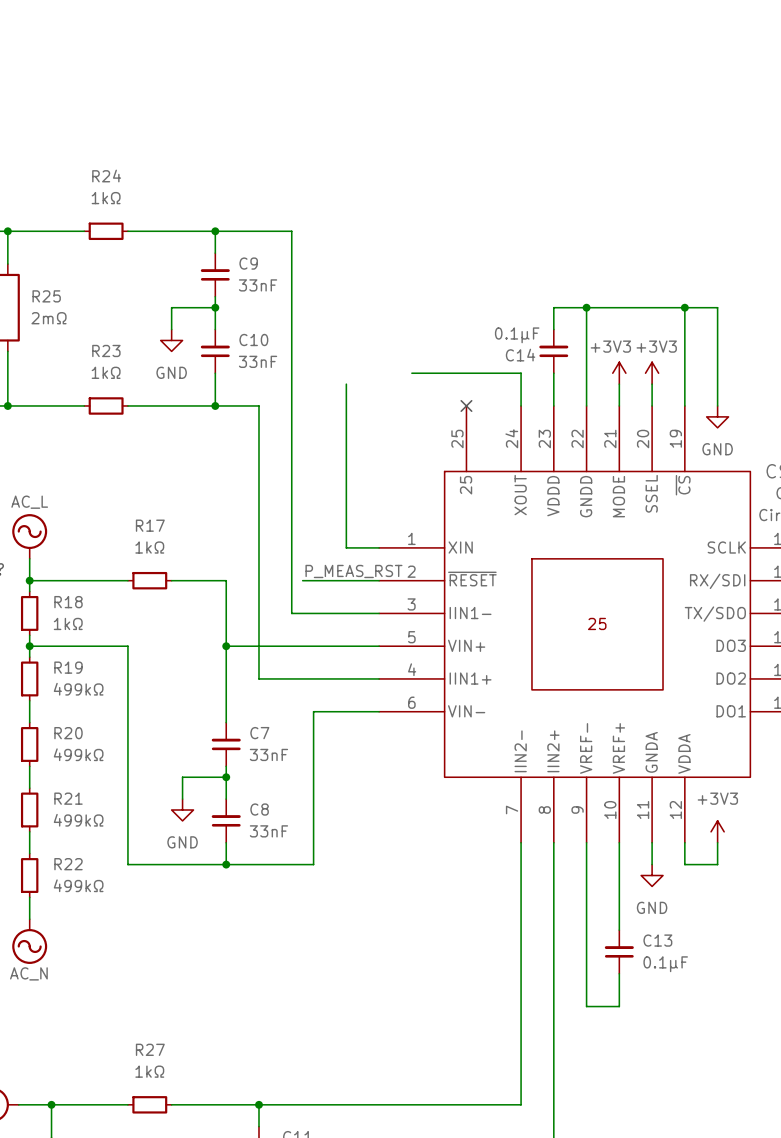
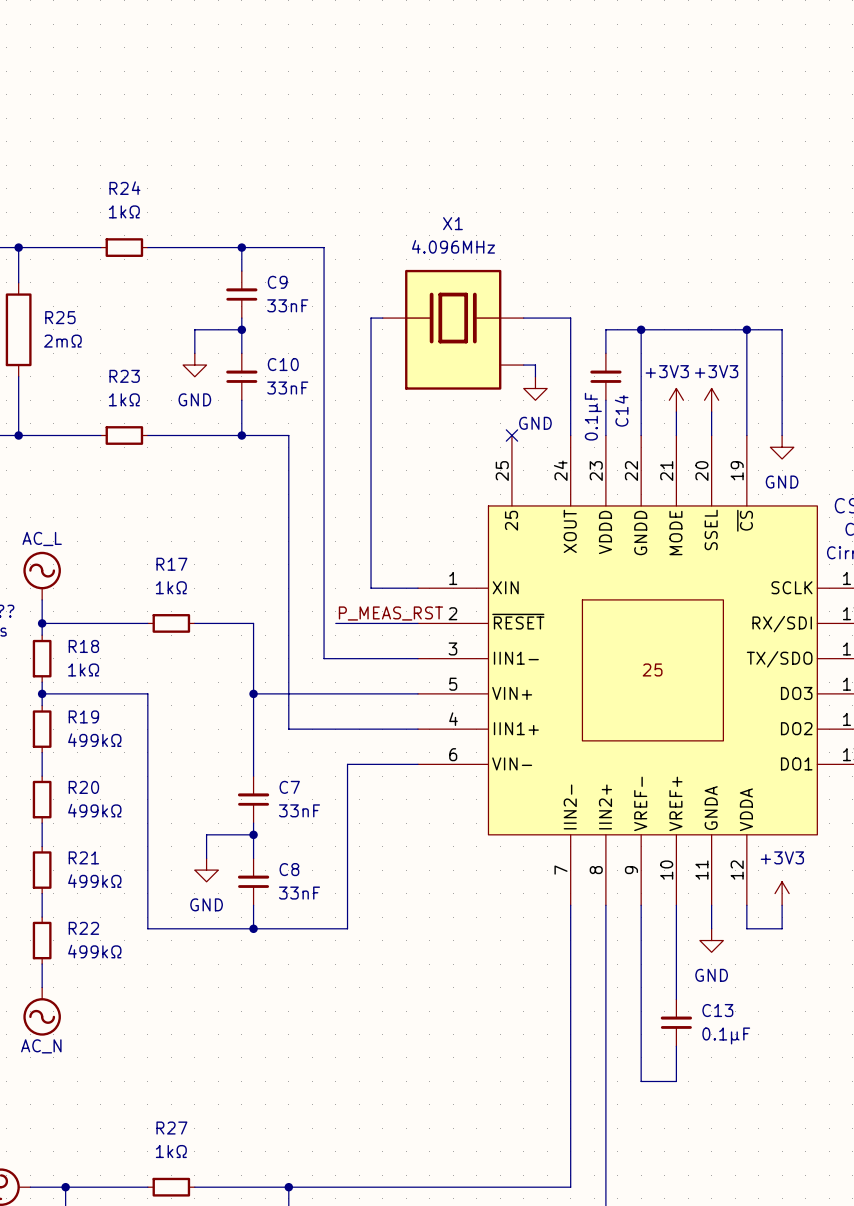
X1: none -> (453, 329)
C14 text rotation: 0° (517, 335) -> 90° counterclockwise (593, 416)
C14 text position: 0.1µF (517, 335) -> 0.1µF (593, 416)
wire: none -> (523, 365) (535, 365) (535, 376)
C14 name rotation: 0° (520, 355) -> 90° counterclockwise (621, 410)
C14 name position: C14 (520, 355) -> C14 (621, 410)
power symbol: none -> GND (535, 388)
wire: (411, 373) (521, 373) -> (523, 318) (570, 318) (570, 400)
wire: (346, 384) (346, 547) -> (382, 318) (371, 318) (371, 588) (382, 588)

